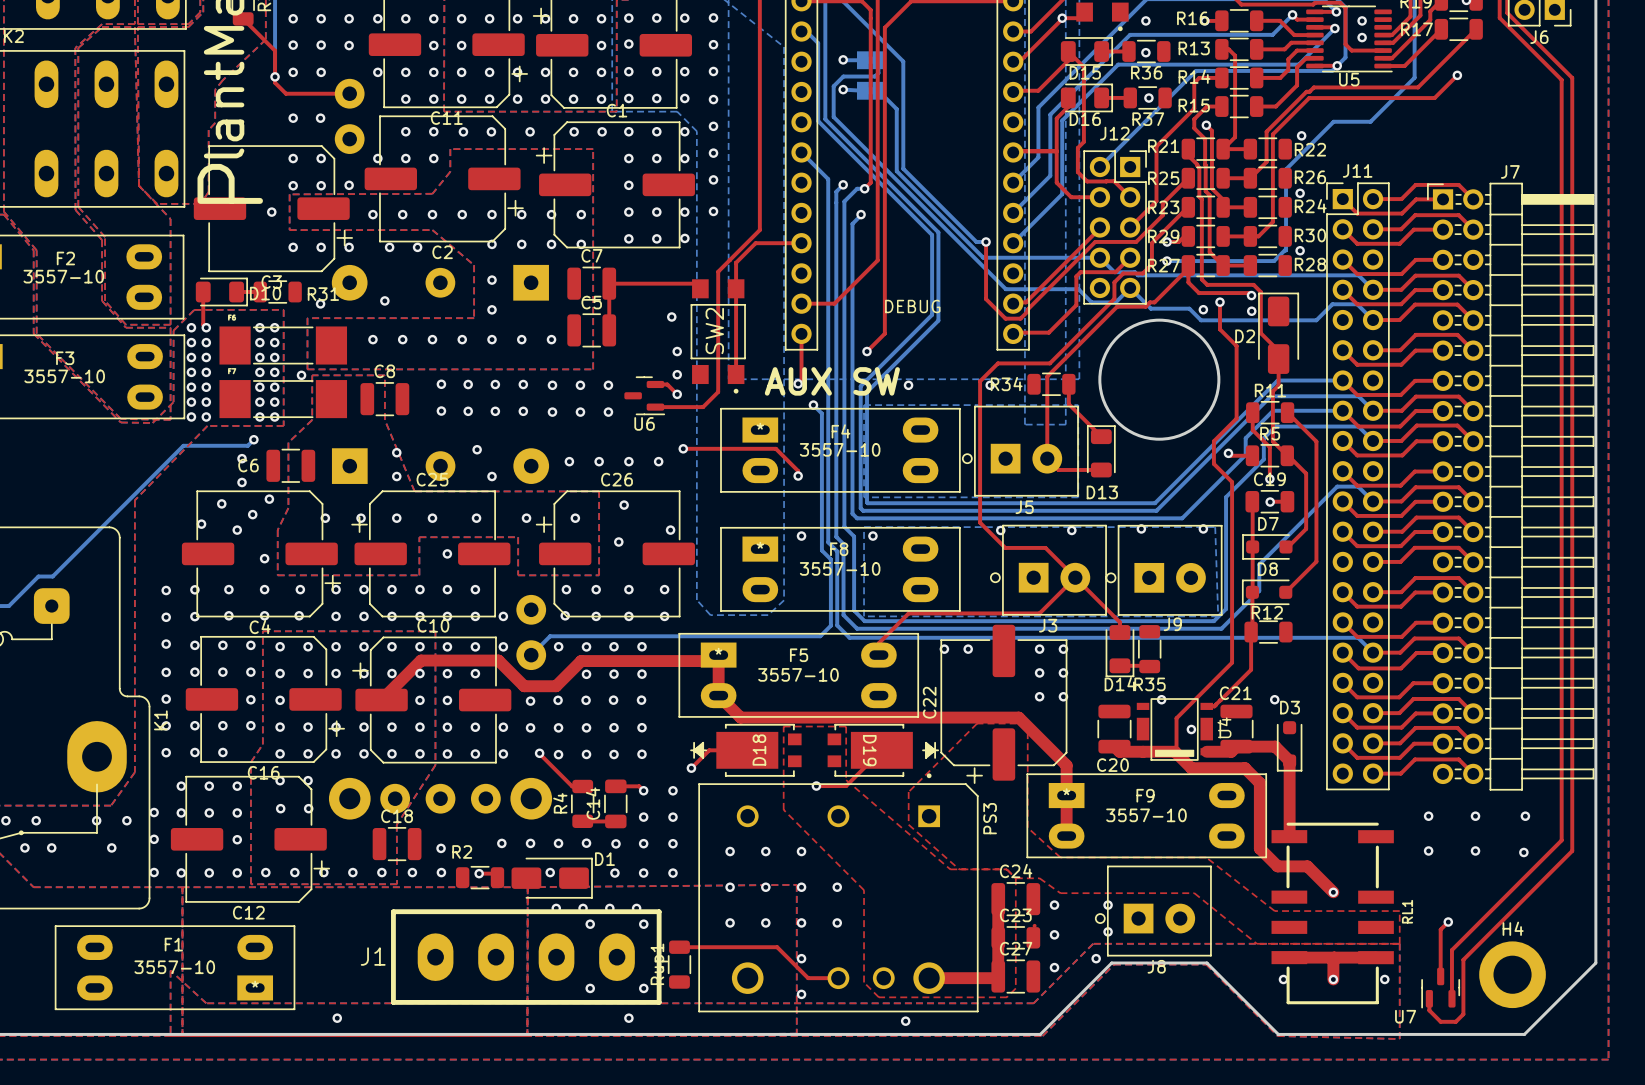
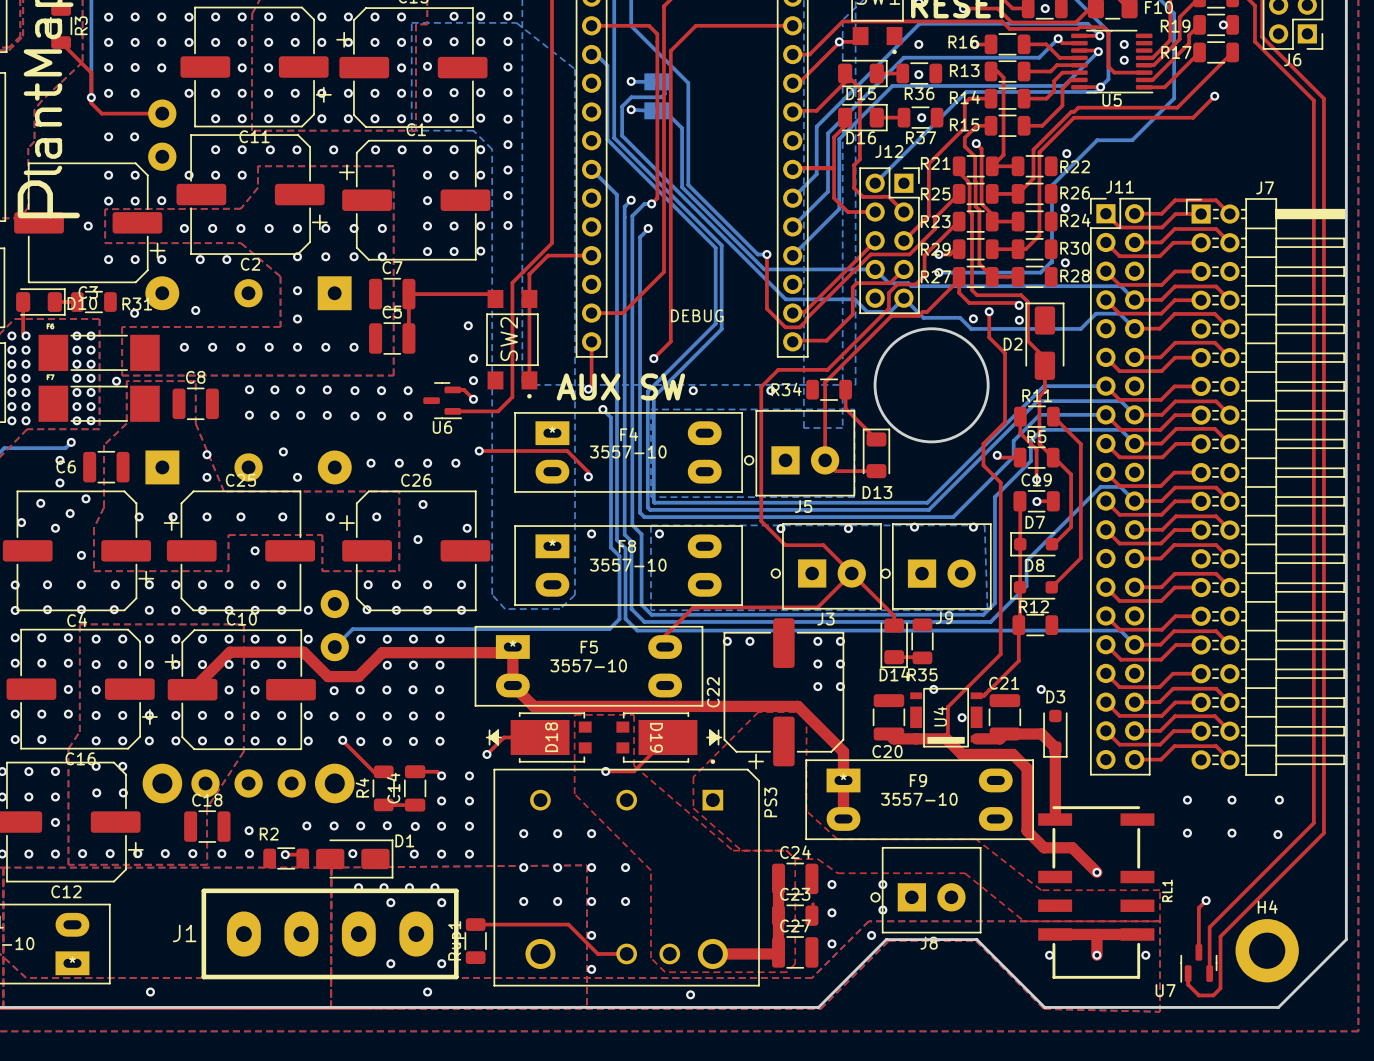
U4 name position: U4 (1224, 727) -> U4 (940, 716)

